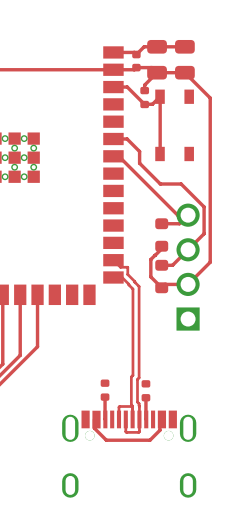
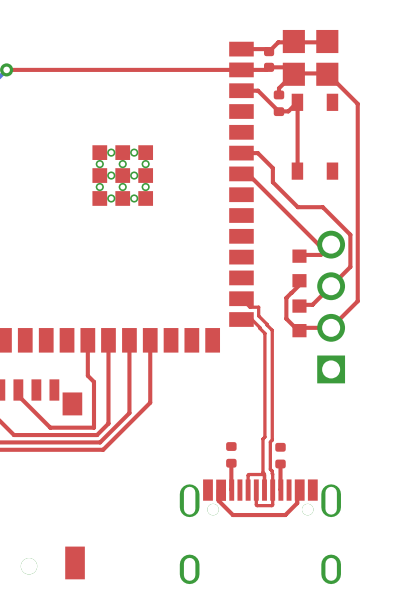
part footprint: [147, 39, 167, 80] -> [282, 29, 305, 86]
part footprint: [175, 39, 195, 80] -> [316, 29, 339, 86]
part footprint: [155, 218, 169, 252] -> [292, 249, 307, 288]
part footprint: [155, 259, 169, 294] -> [292, 299, 307, 338]

